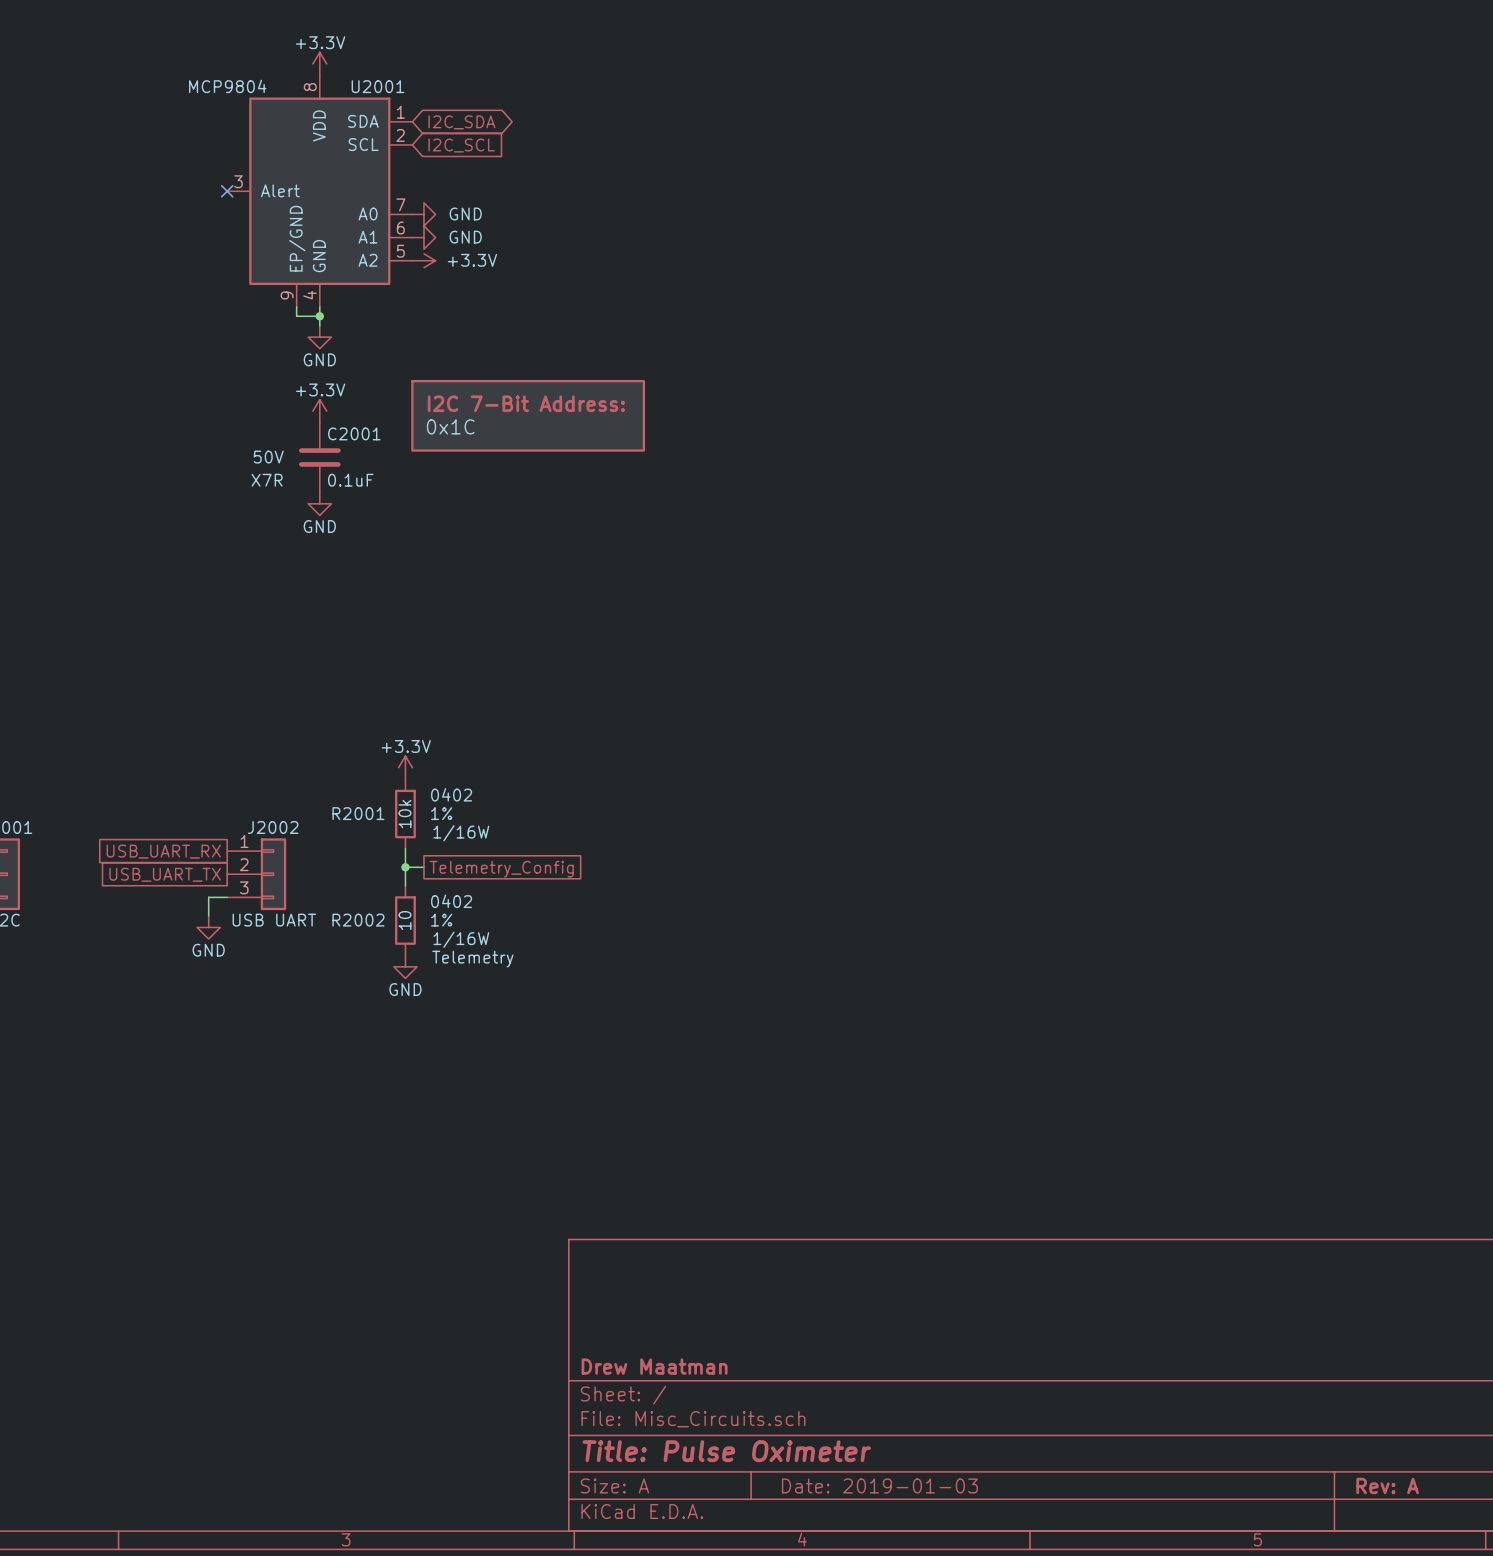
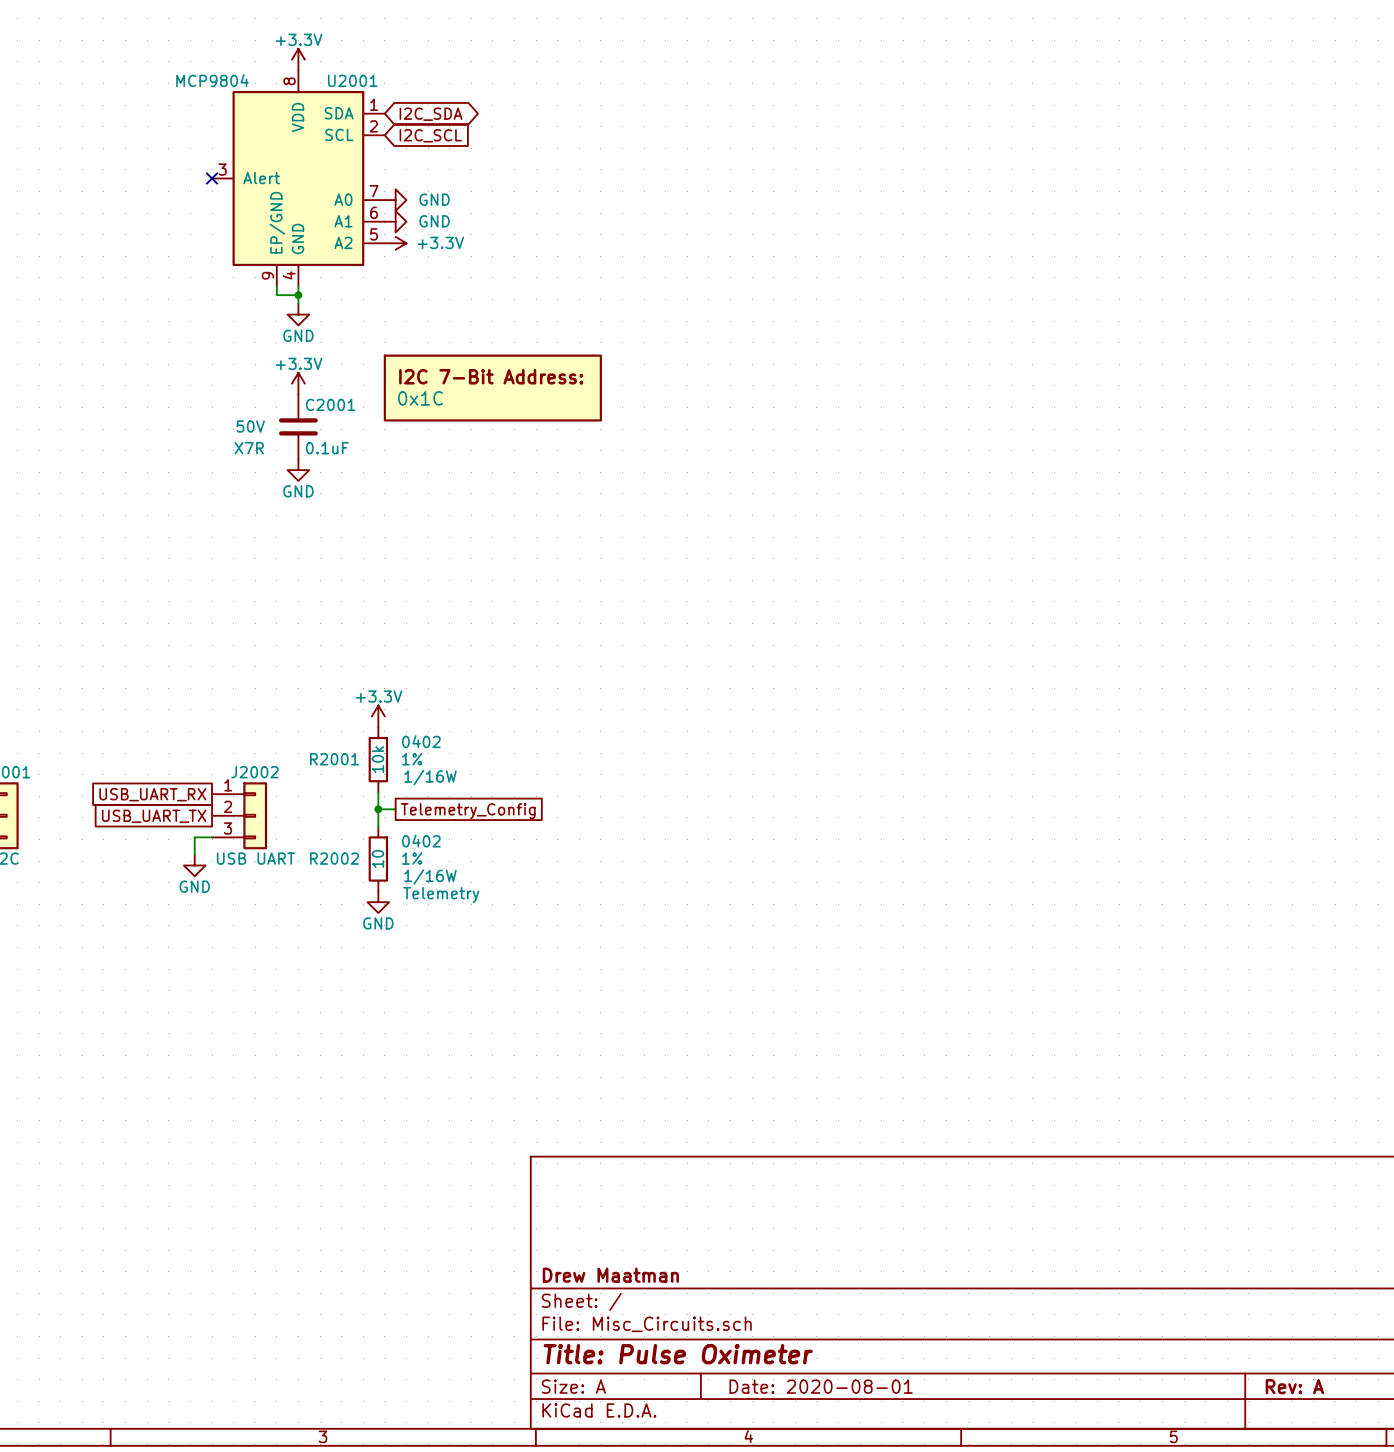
title block: Date: 2019-01-03 (879, 1485) -> Date: 2020-08-01 (821, 1386)

